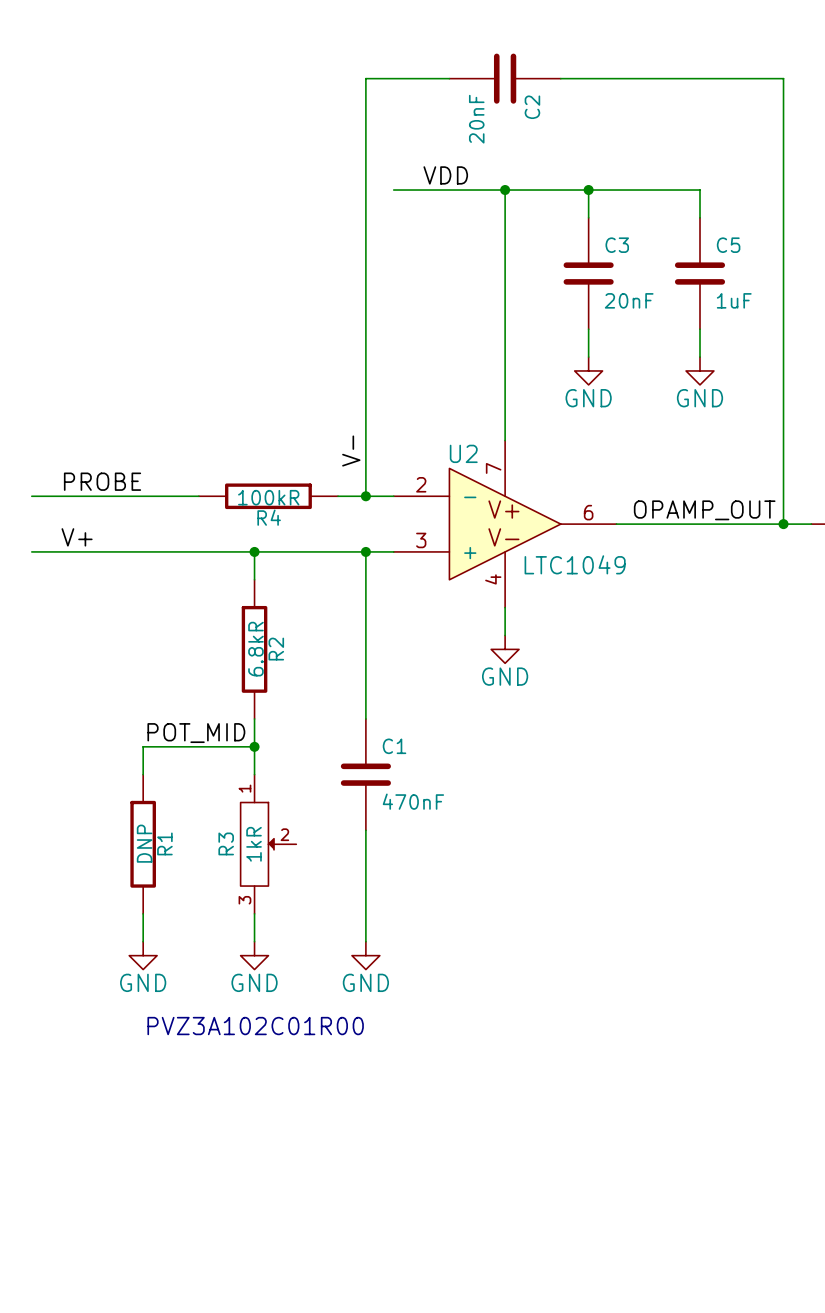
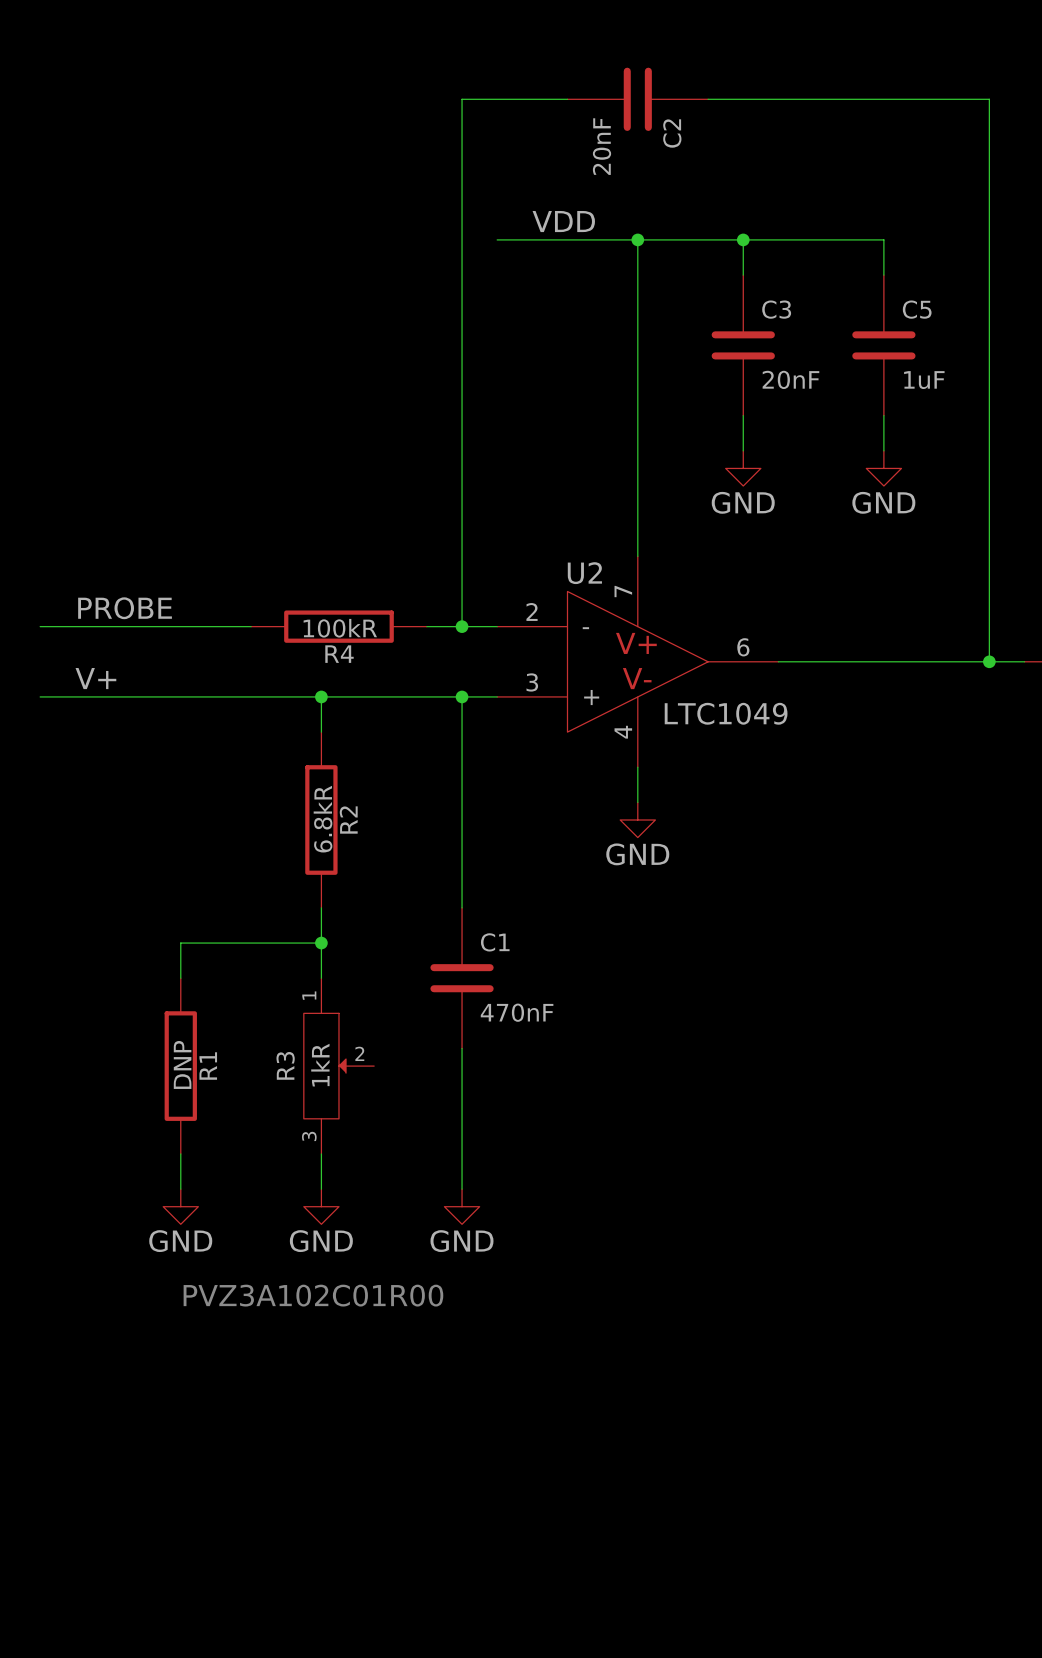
label: V- (351, 451) -> none
label: OPAMP_OUT (704, 510) -> none
label: POT_MID (196, 733) -> none

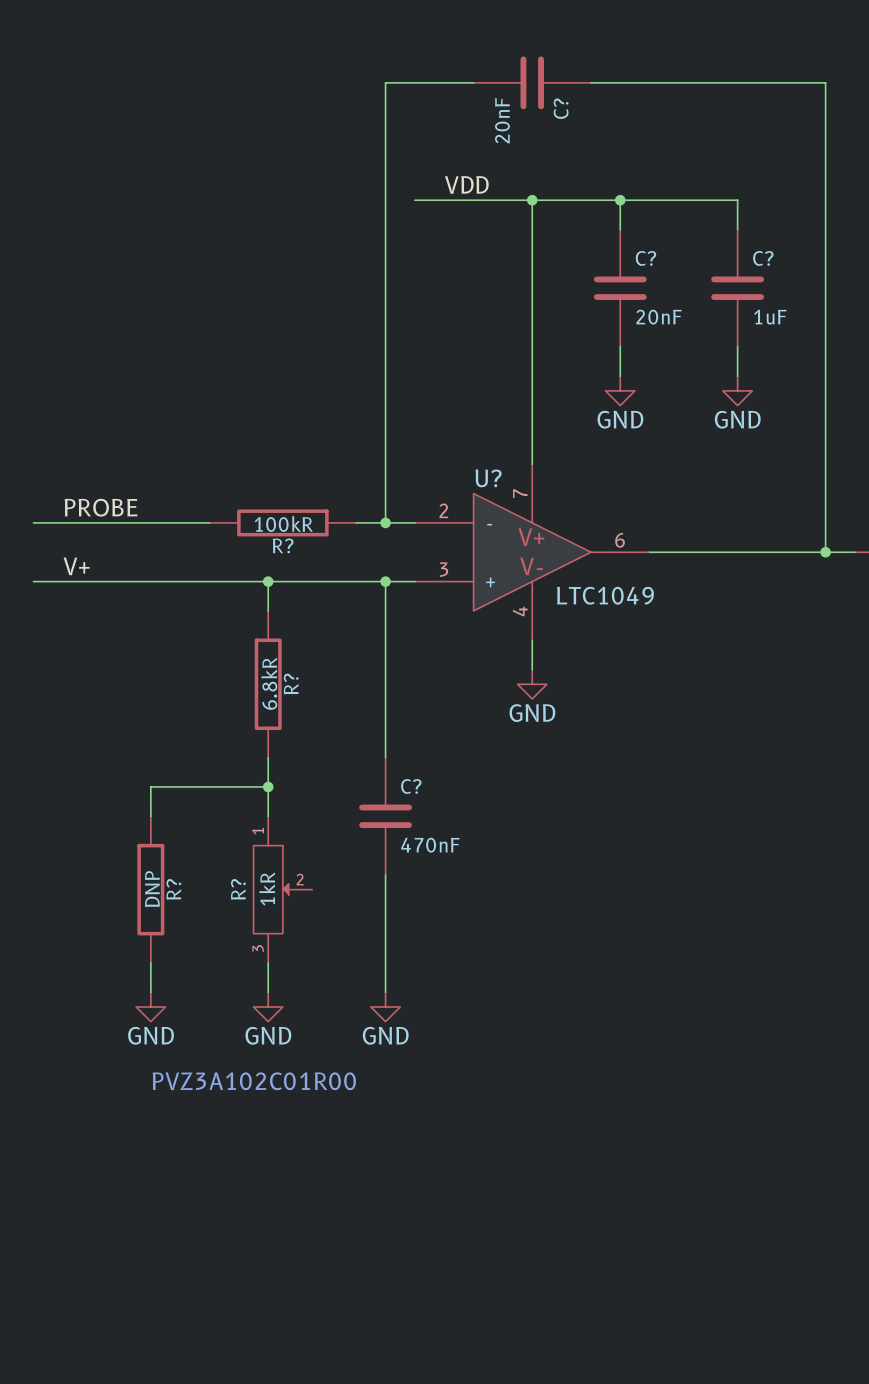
C2 name: C2 (672, 133) -> C? (561, 108)
C3 name: C3 (776, 309) -> C? (645, 258)
C5 name: C5 (917, 309) -> C? (763, 258)
U2 name: U2 (584, 573) -> U? (488, 478)
R4 name: R4 (339, 654) -> R? (283, 545)
R2 name: R2 (348, 820) -> R? (291, 684)
C1 name: C1 (495, 942) -> C? (411, 786)
R3 name: R3 (285, 1065) -> R? (238, 889)
R1 name: R1 (208, 1066) -> R? (173, 889)

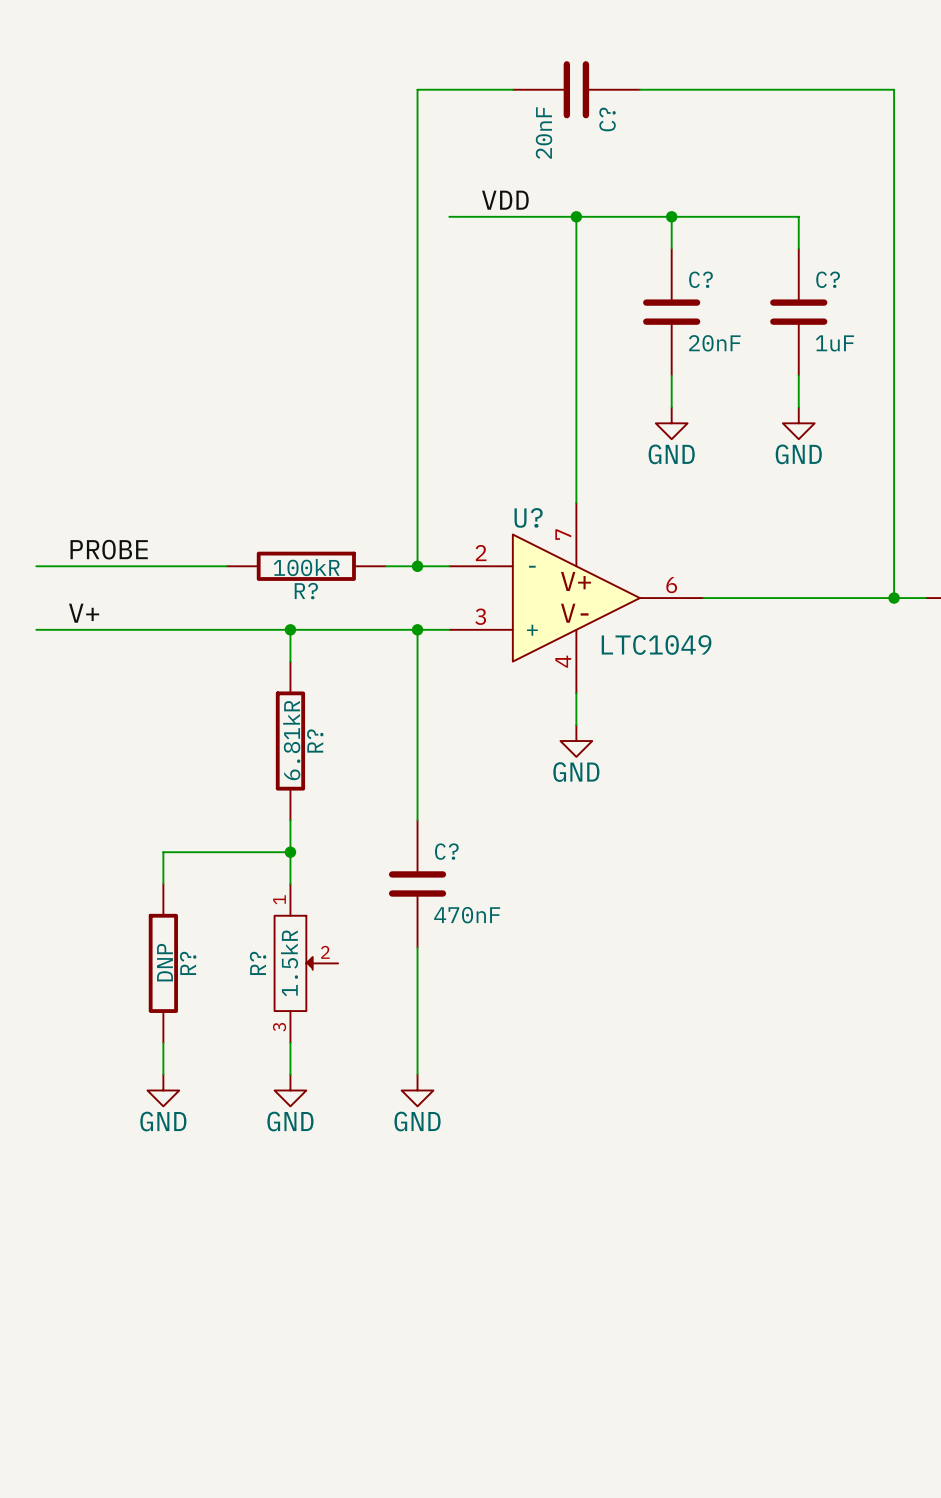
R? value: 6.8kR (269, 683) -> 6.81kR (291, 740)
R? value: 1kR (267, 889) -> 1.5kR (289, 963)
text: PVZ3A102C01R00 (254, 1081) -> none

